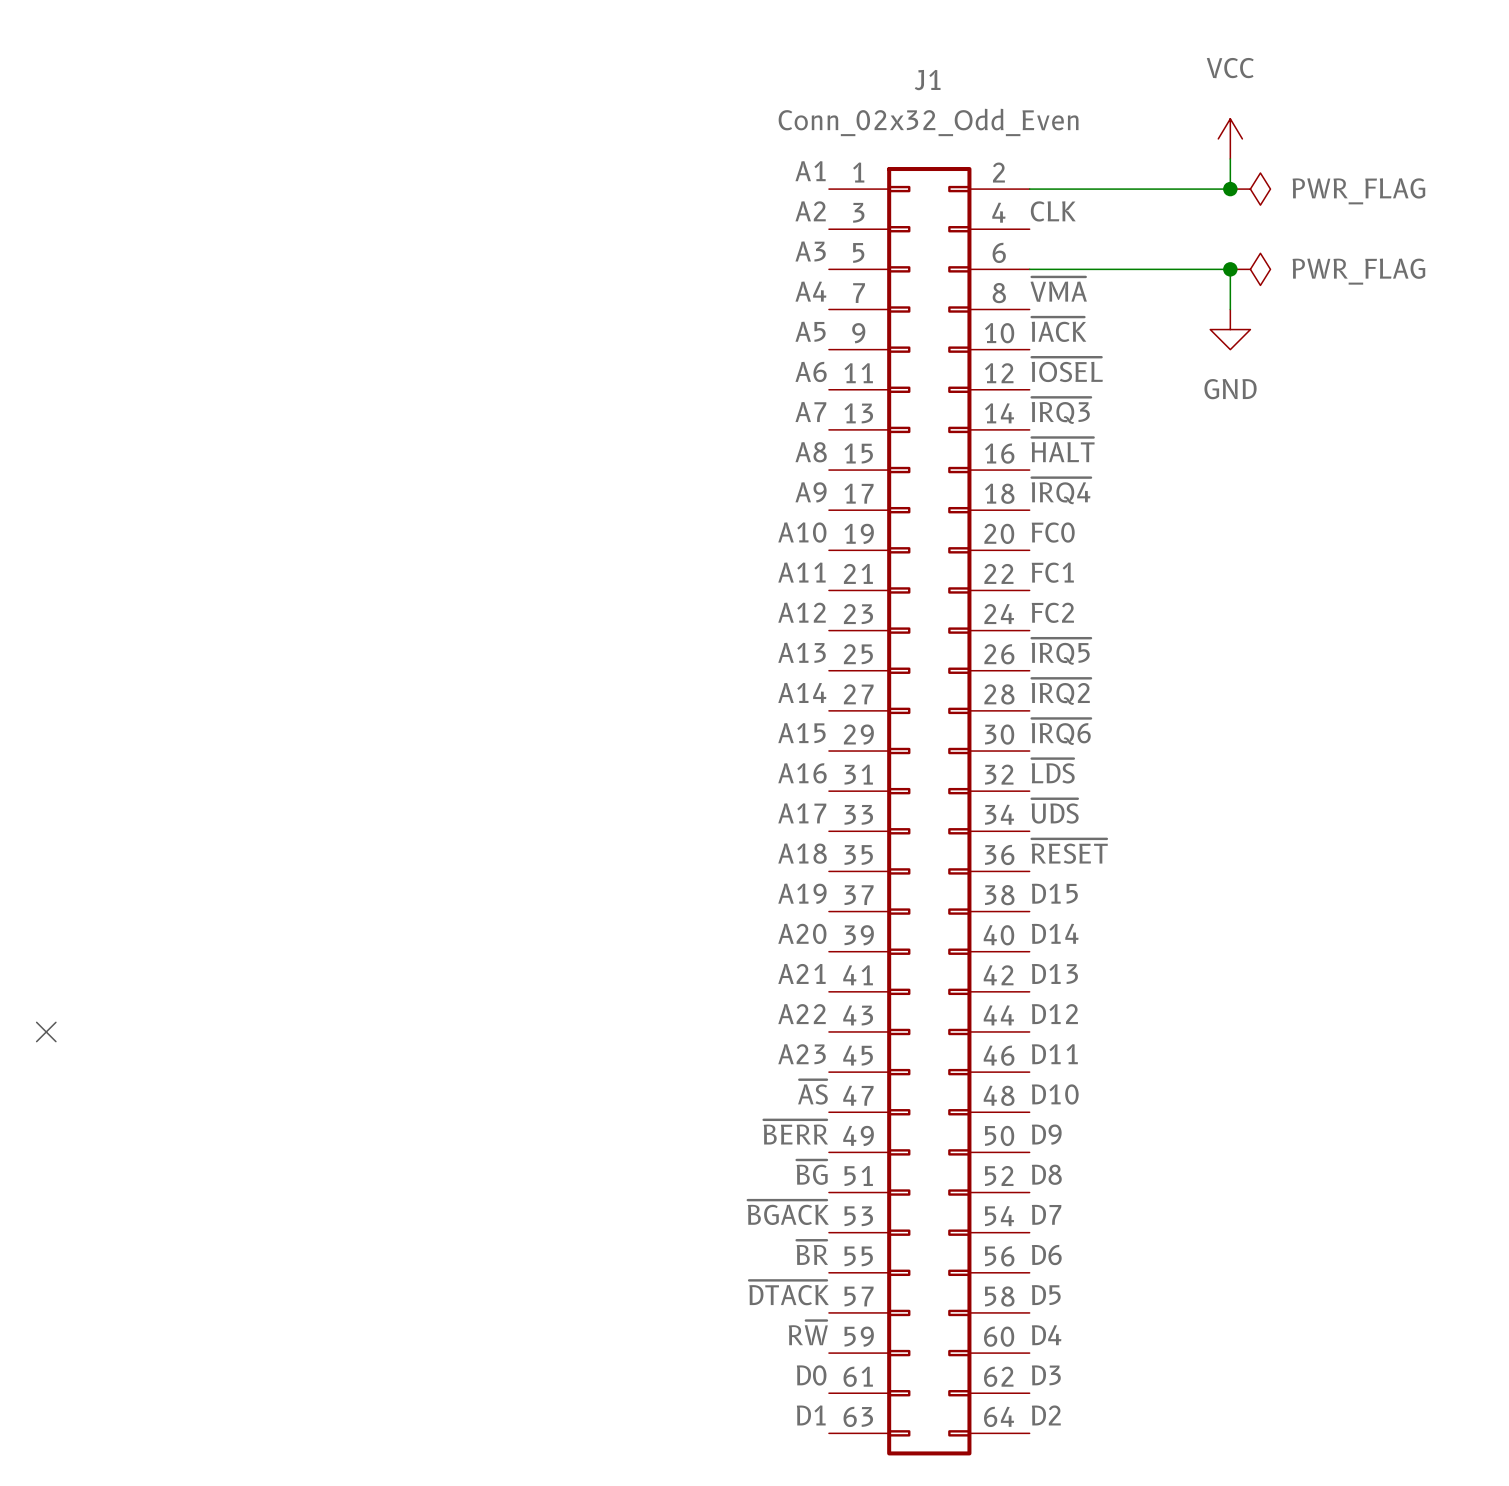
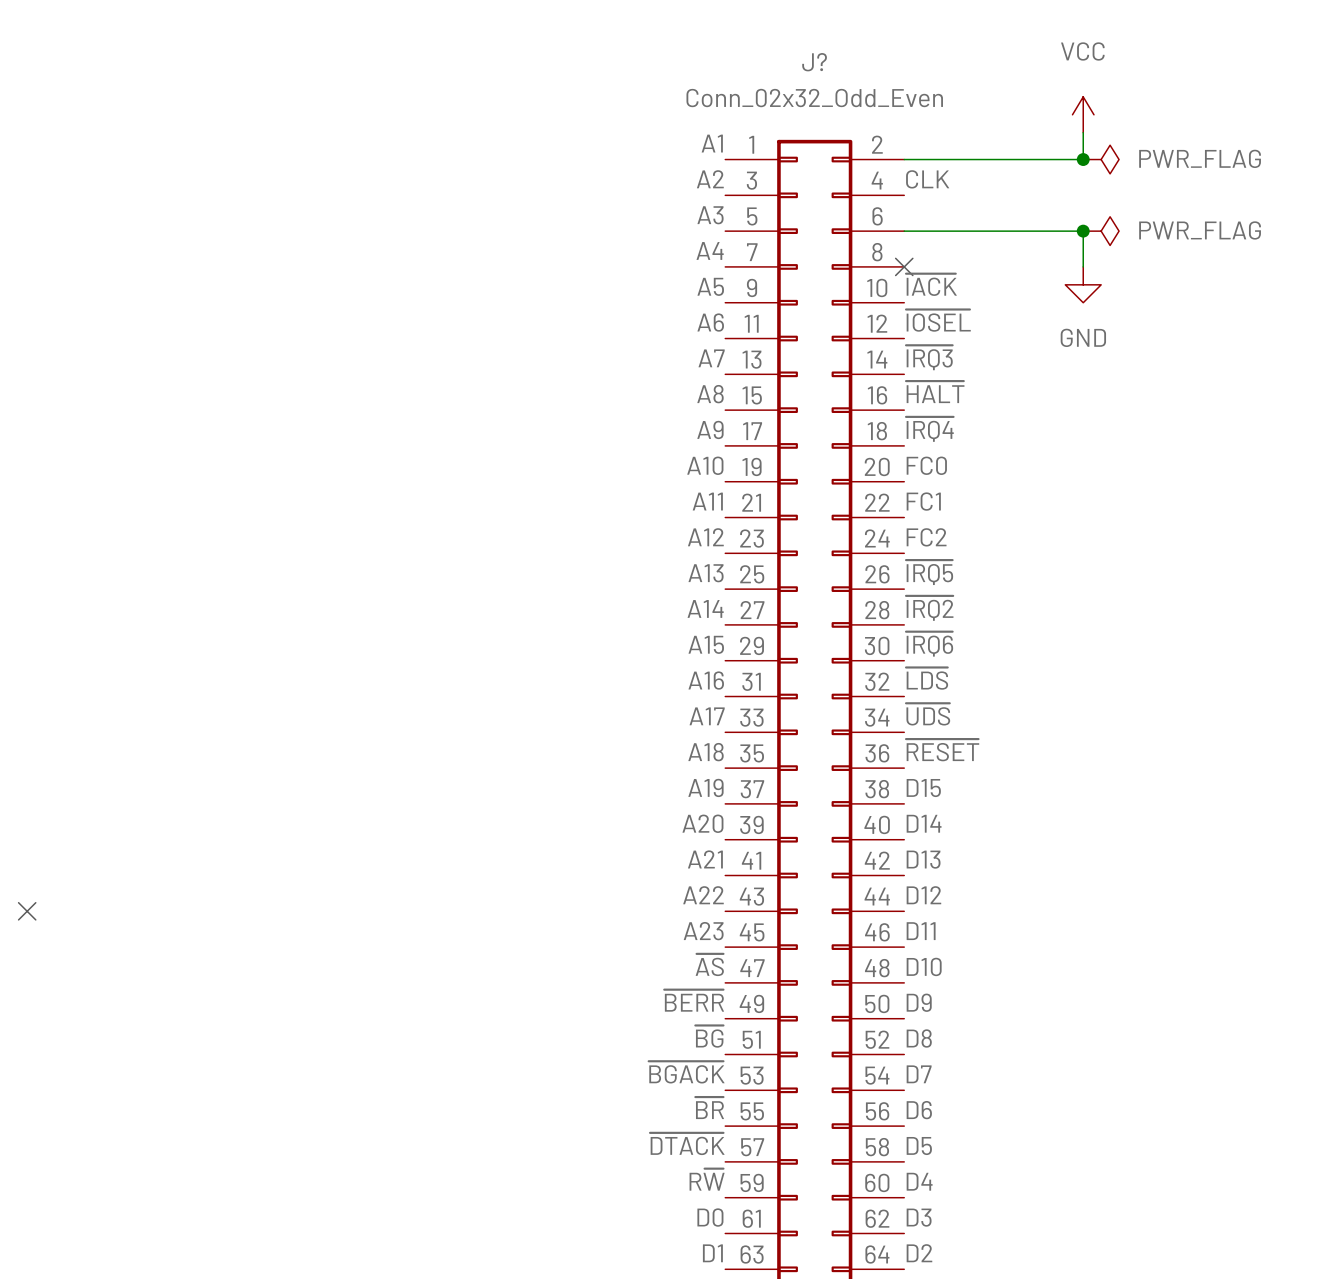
J1 name: J1 (927, 80) -> J? (814, 62)
label: ~{VMA} (1058, 289) -> none
no-connect mark: none -> (904, 266)

